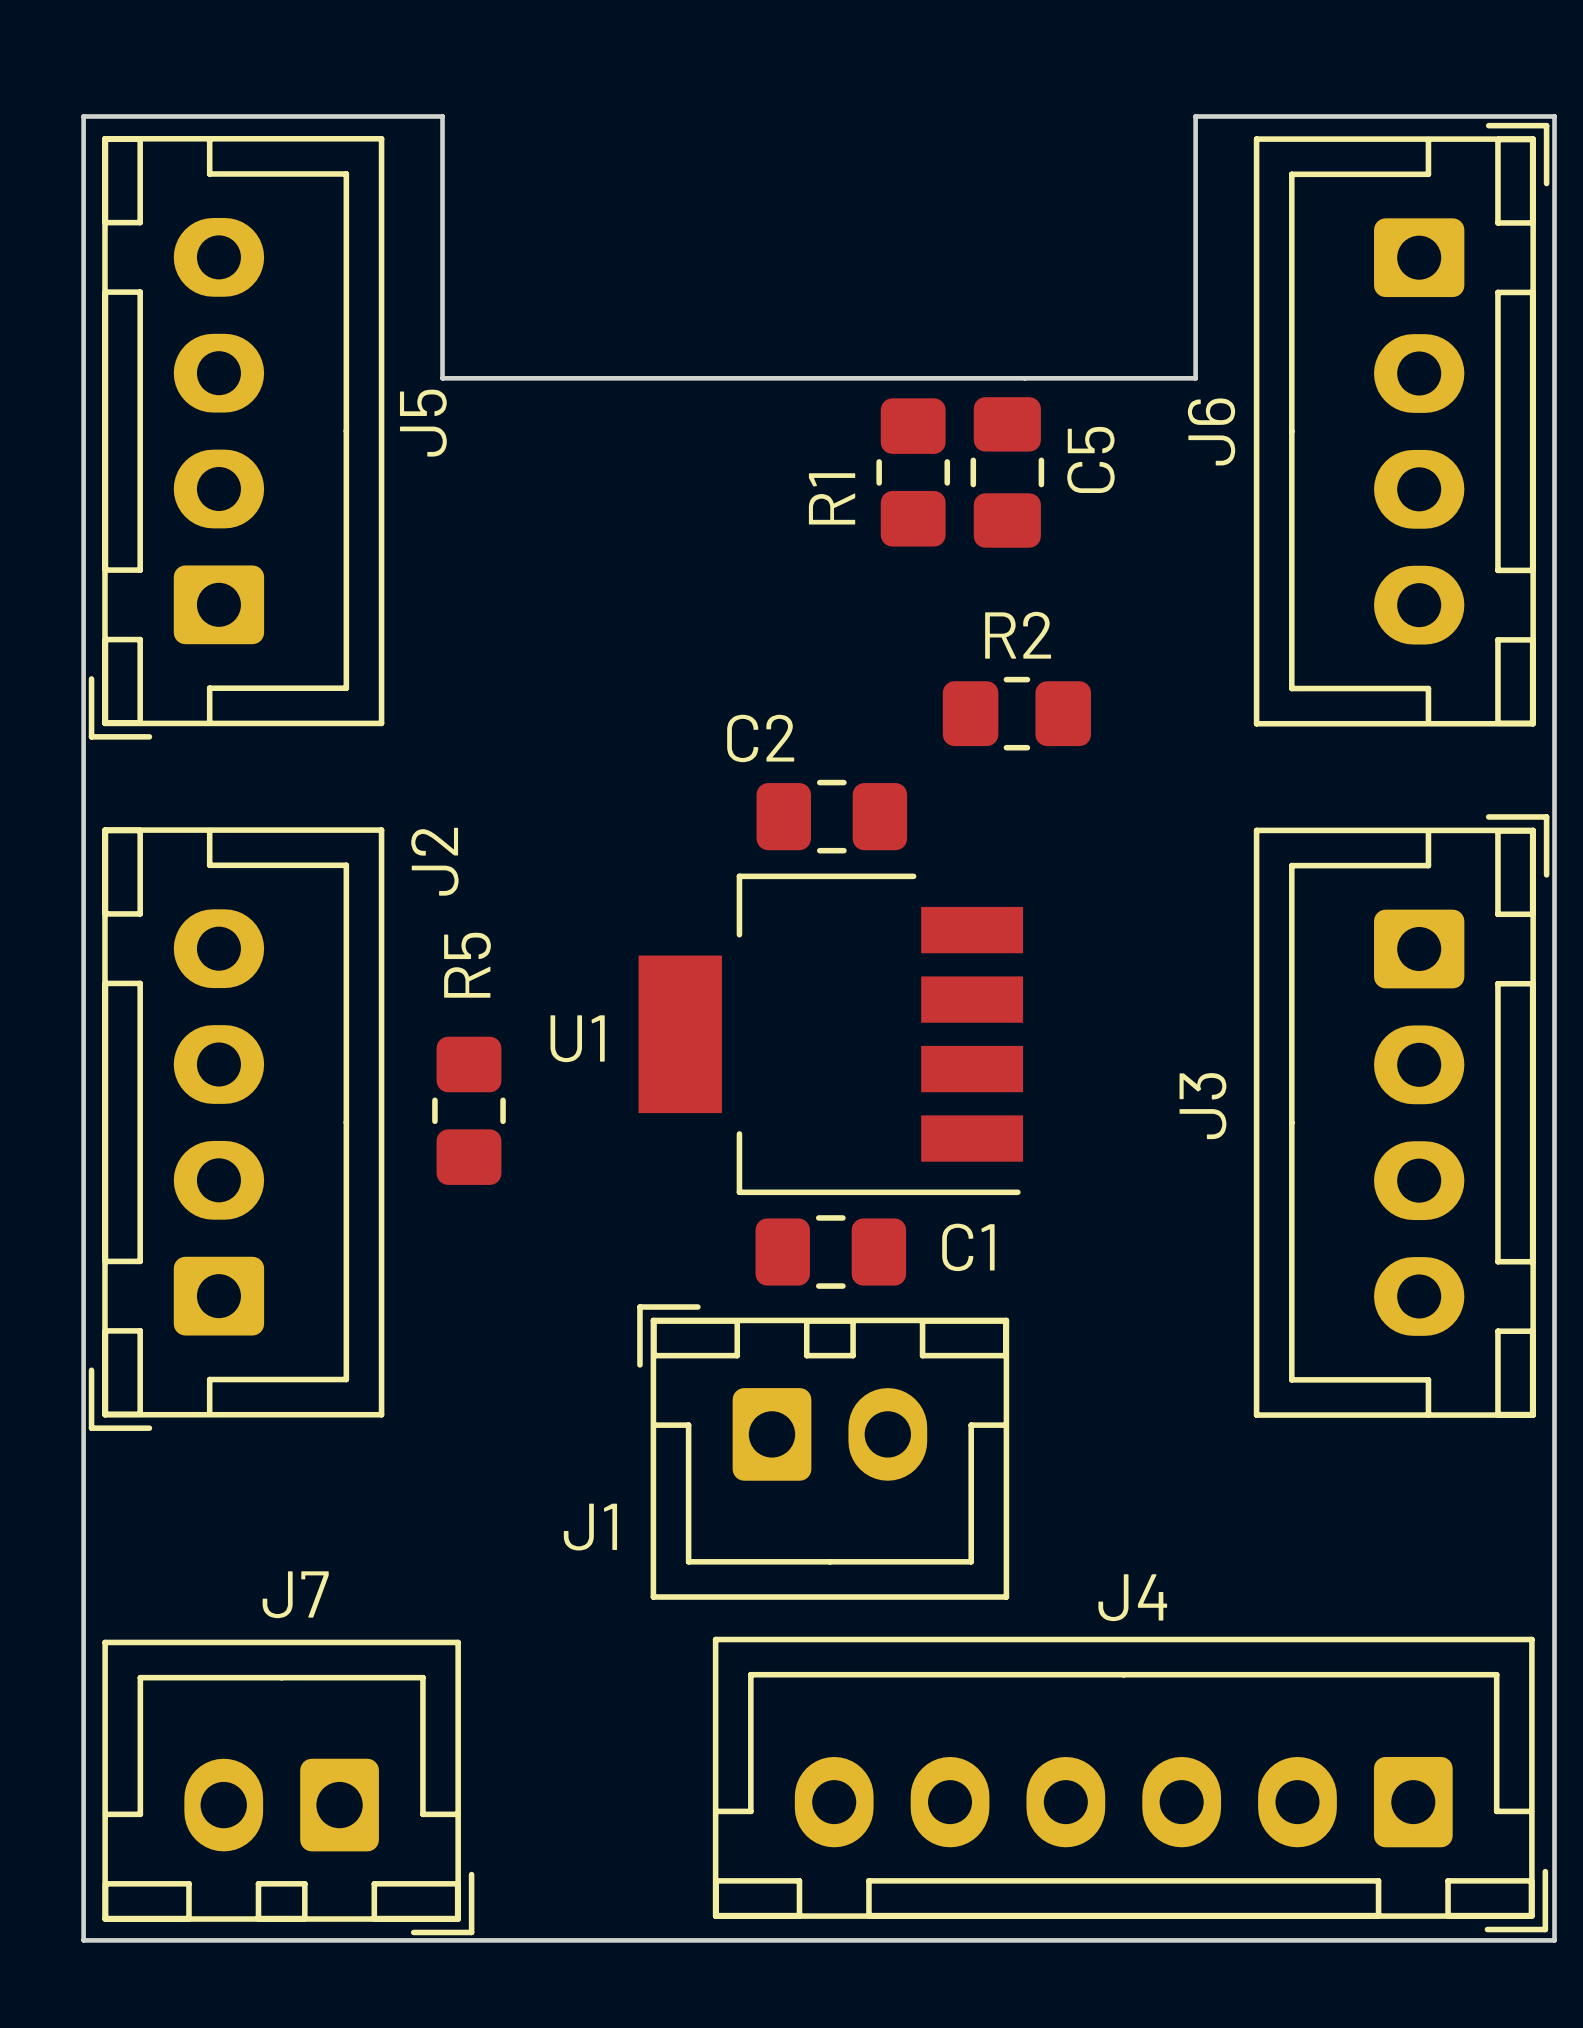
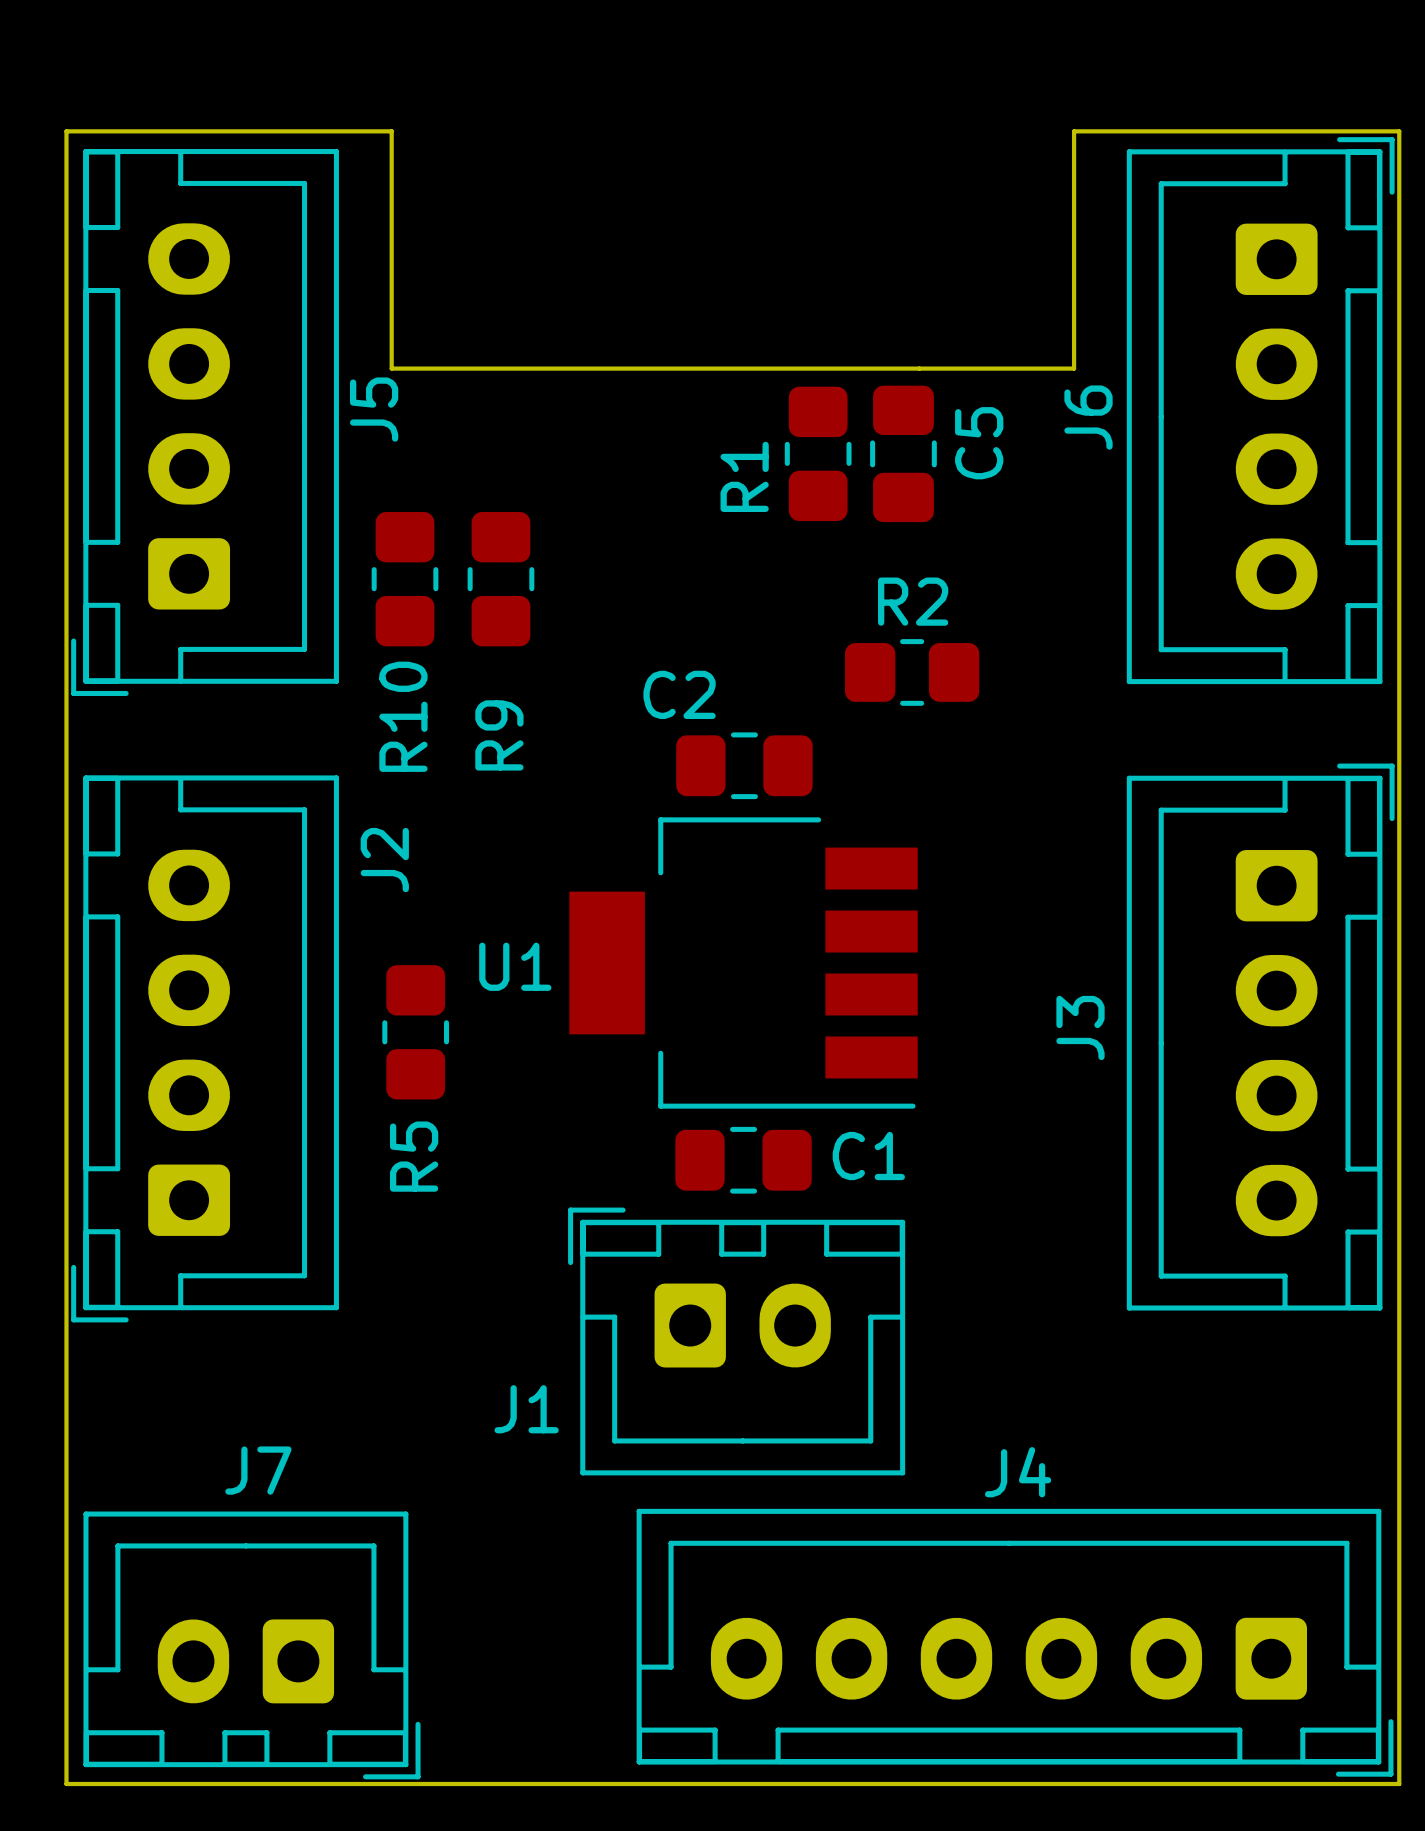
R10: none -> (405, 579)
R9: none -> (500, 579)
J2 name position: J2 (434, 861) -> J2 (384, 860)
R5 name position: R5 (467, 965) -> R5 (414, 1156)

